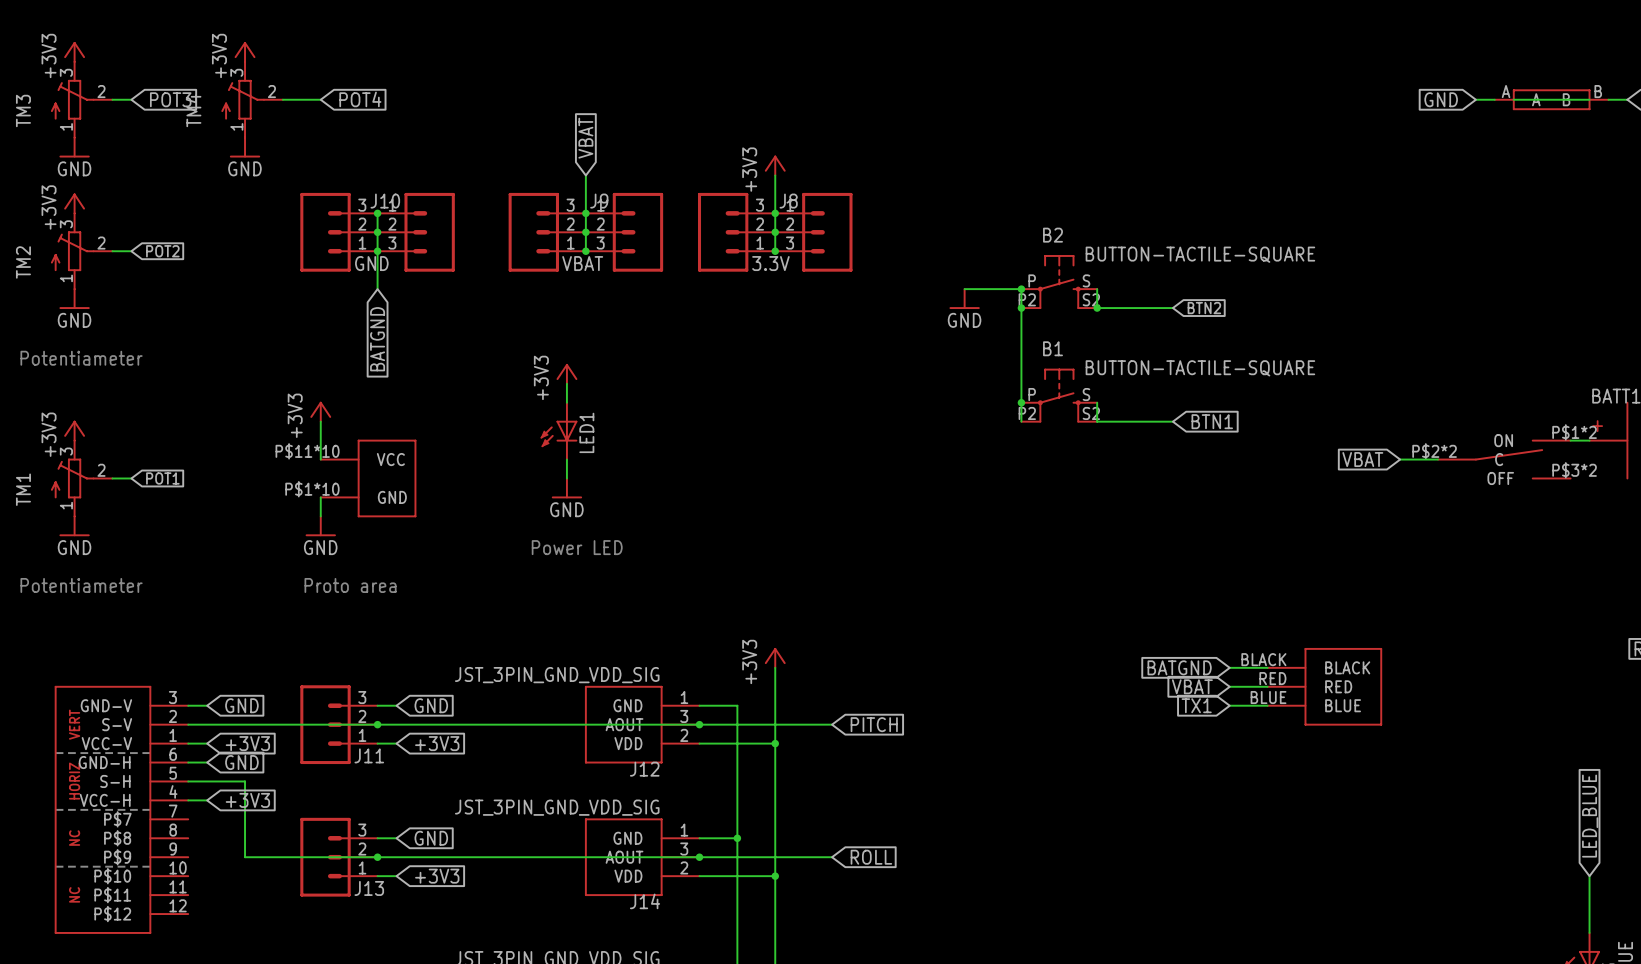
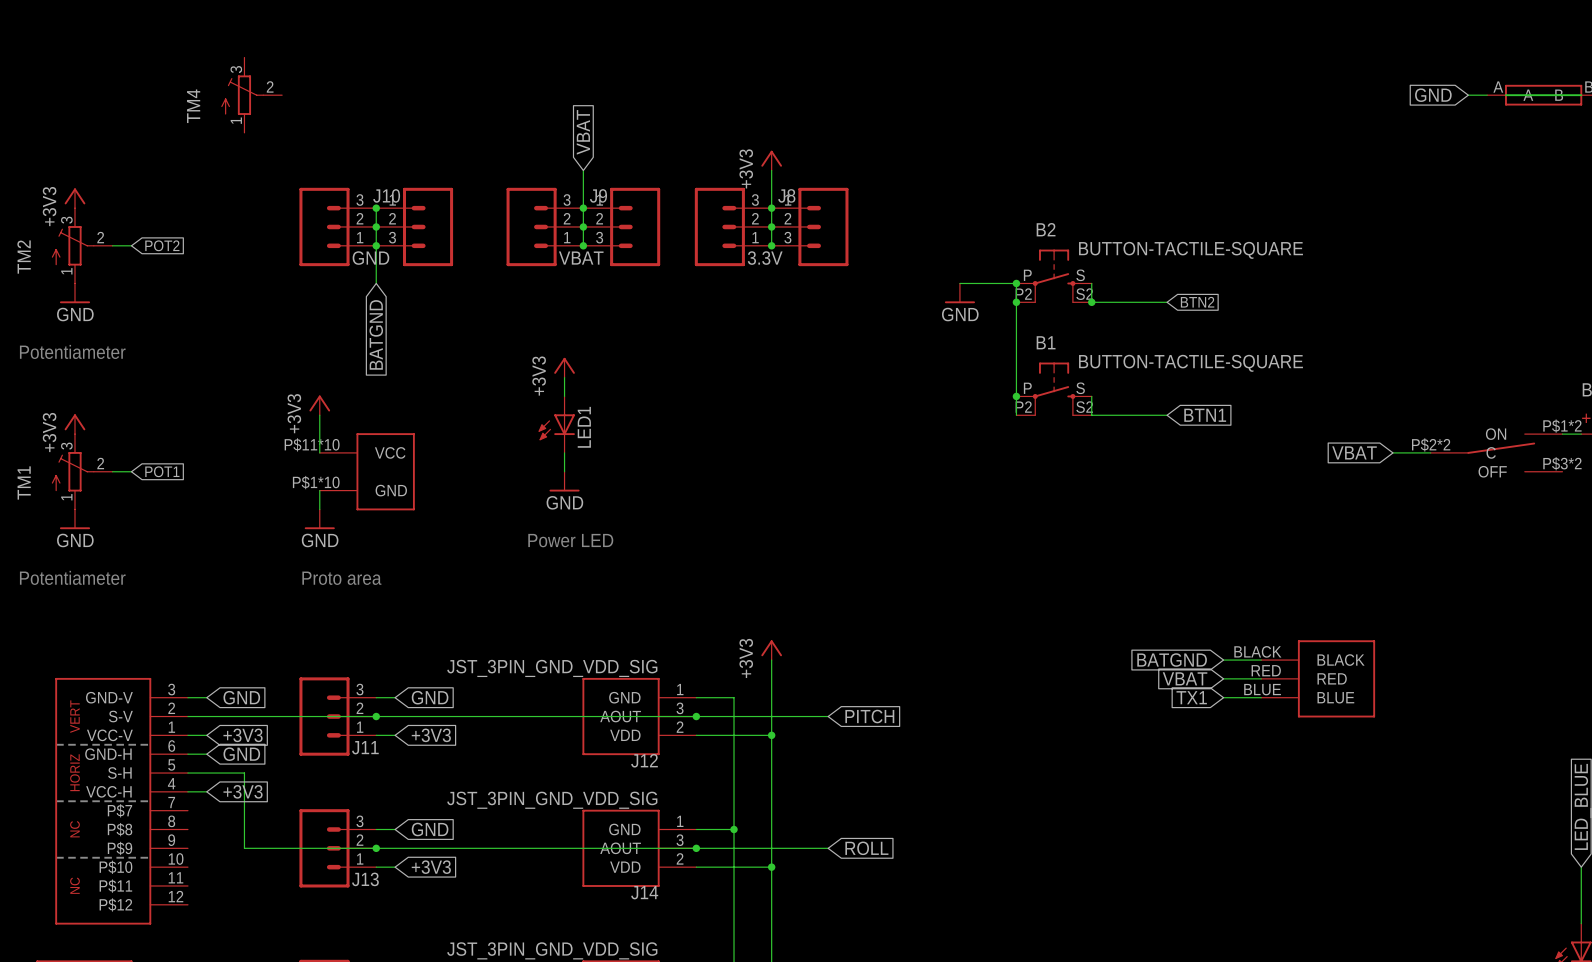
power symbol: +3V3 (74, 51) -> none
power symbol: +3V3 (245, 51) -> none
TM3: (81, 99) -> none
wire: (112, 99) (131, 99) -> none
global label: POT3 (170, 99) -> none
wire: (282, 99) (320, 99) -> none
global label: POT4 (360, 99) -> none
power symbol: GND (74, 147) -> none
power symbol: GND (245, 147) -> none

